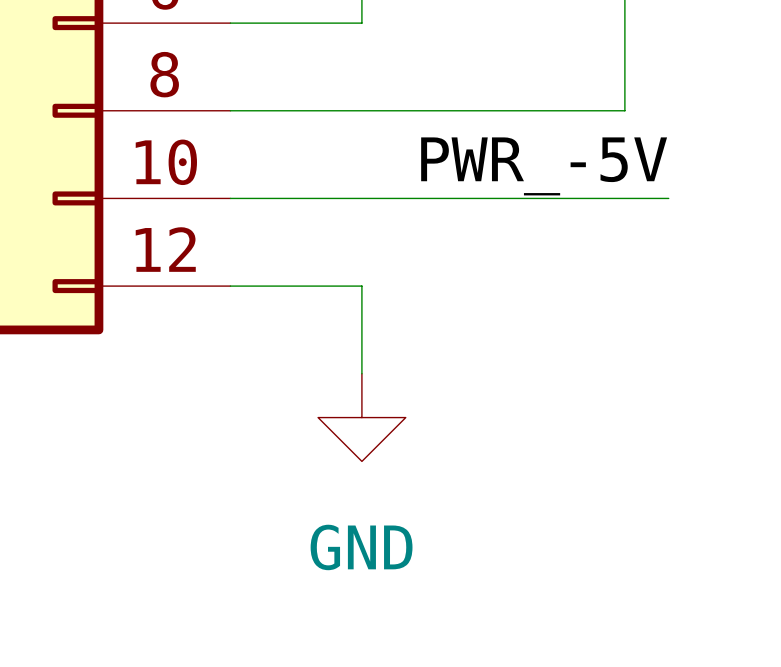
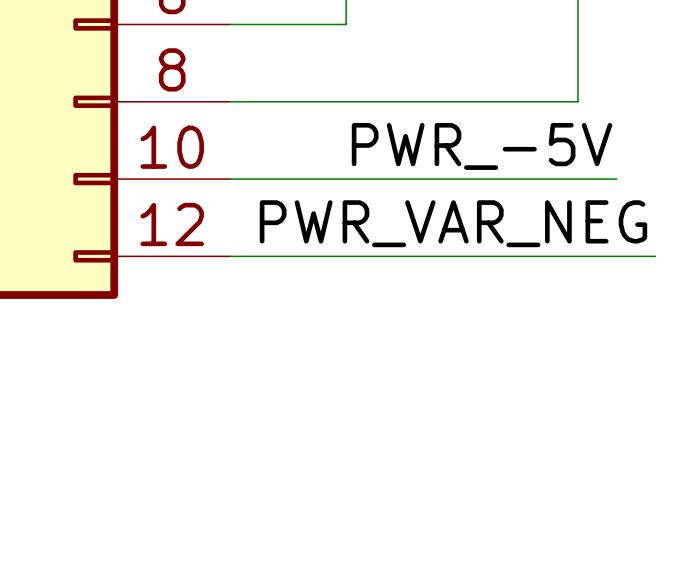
label: none -> PWR_VAR_NEG (453, 223)
wire: (361, 286) (361, 373) -> (346, 256) (655, 256)
power symbol: GND (361, 417) -> none

